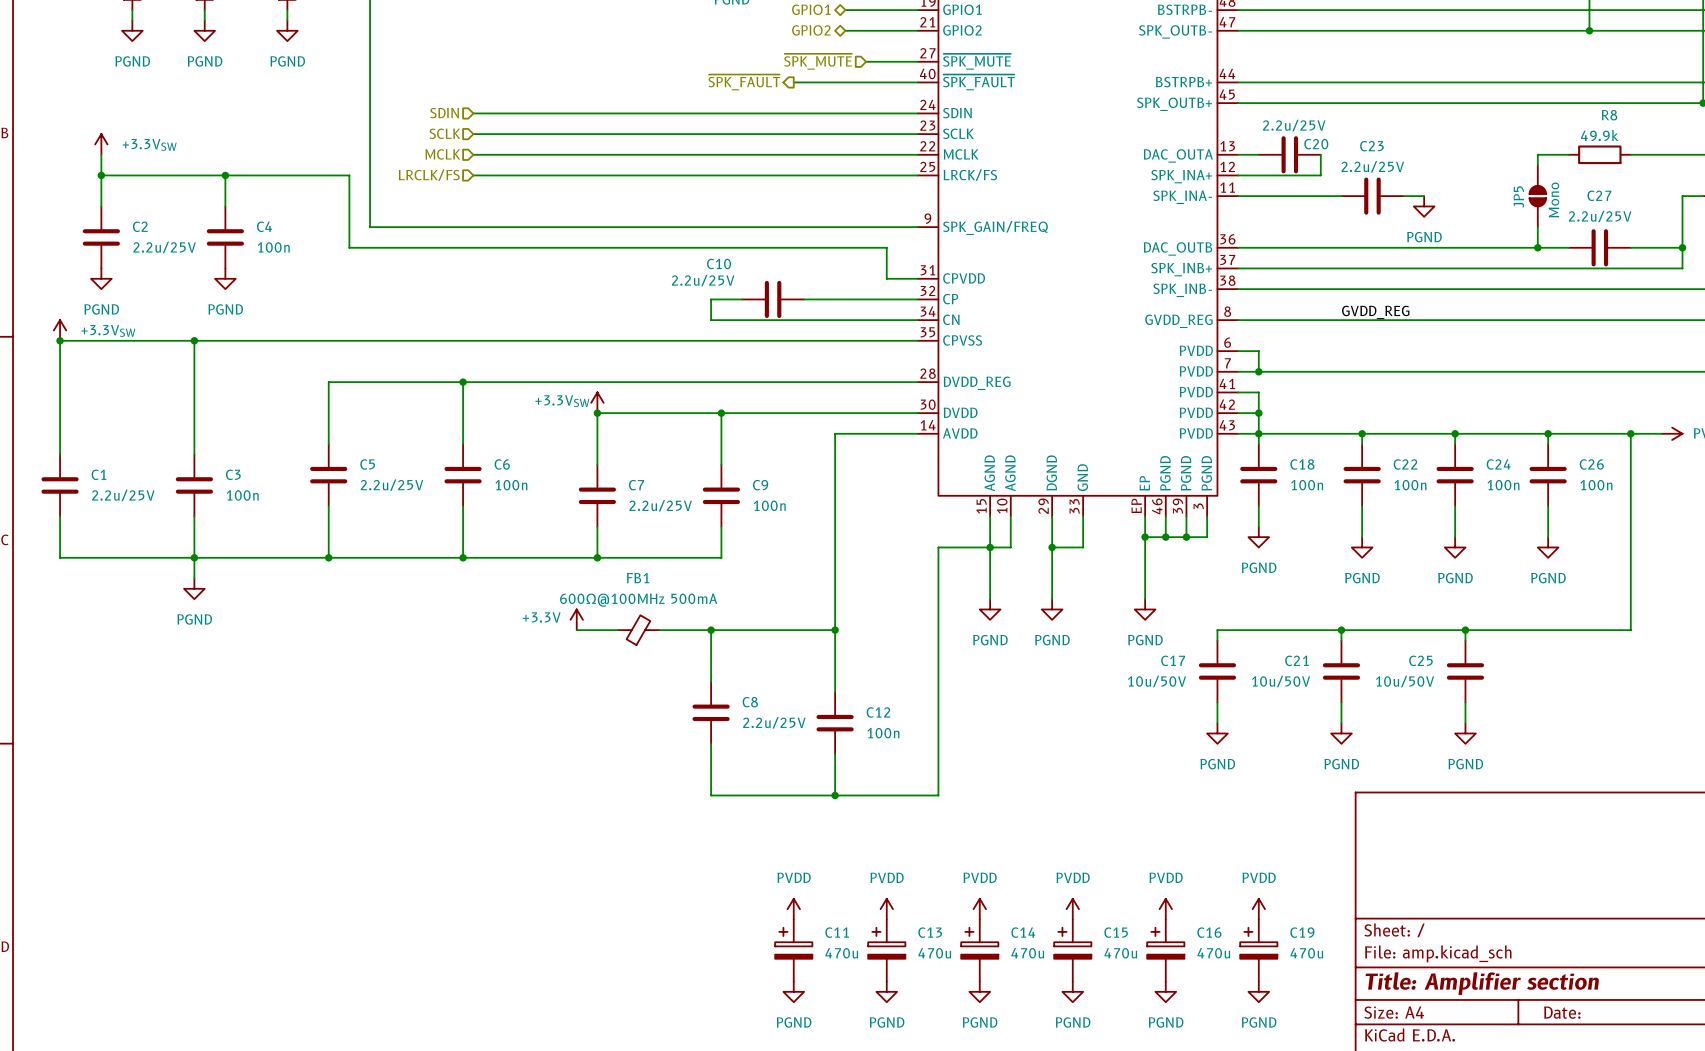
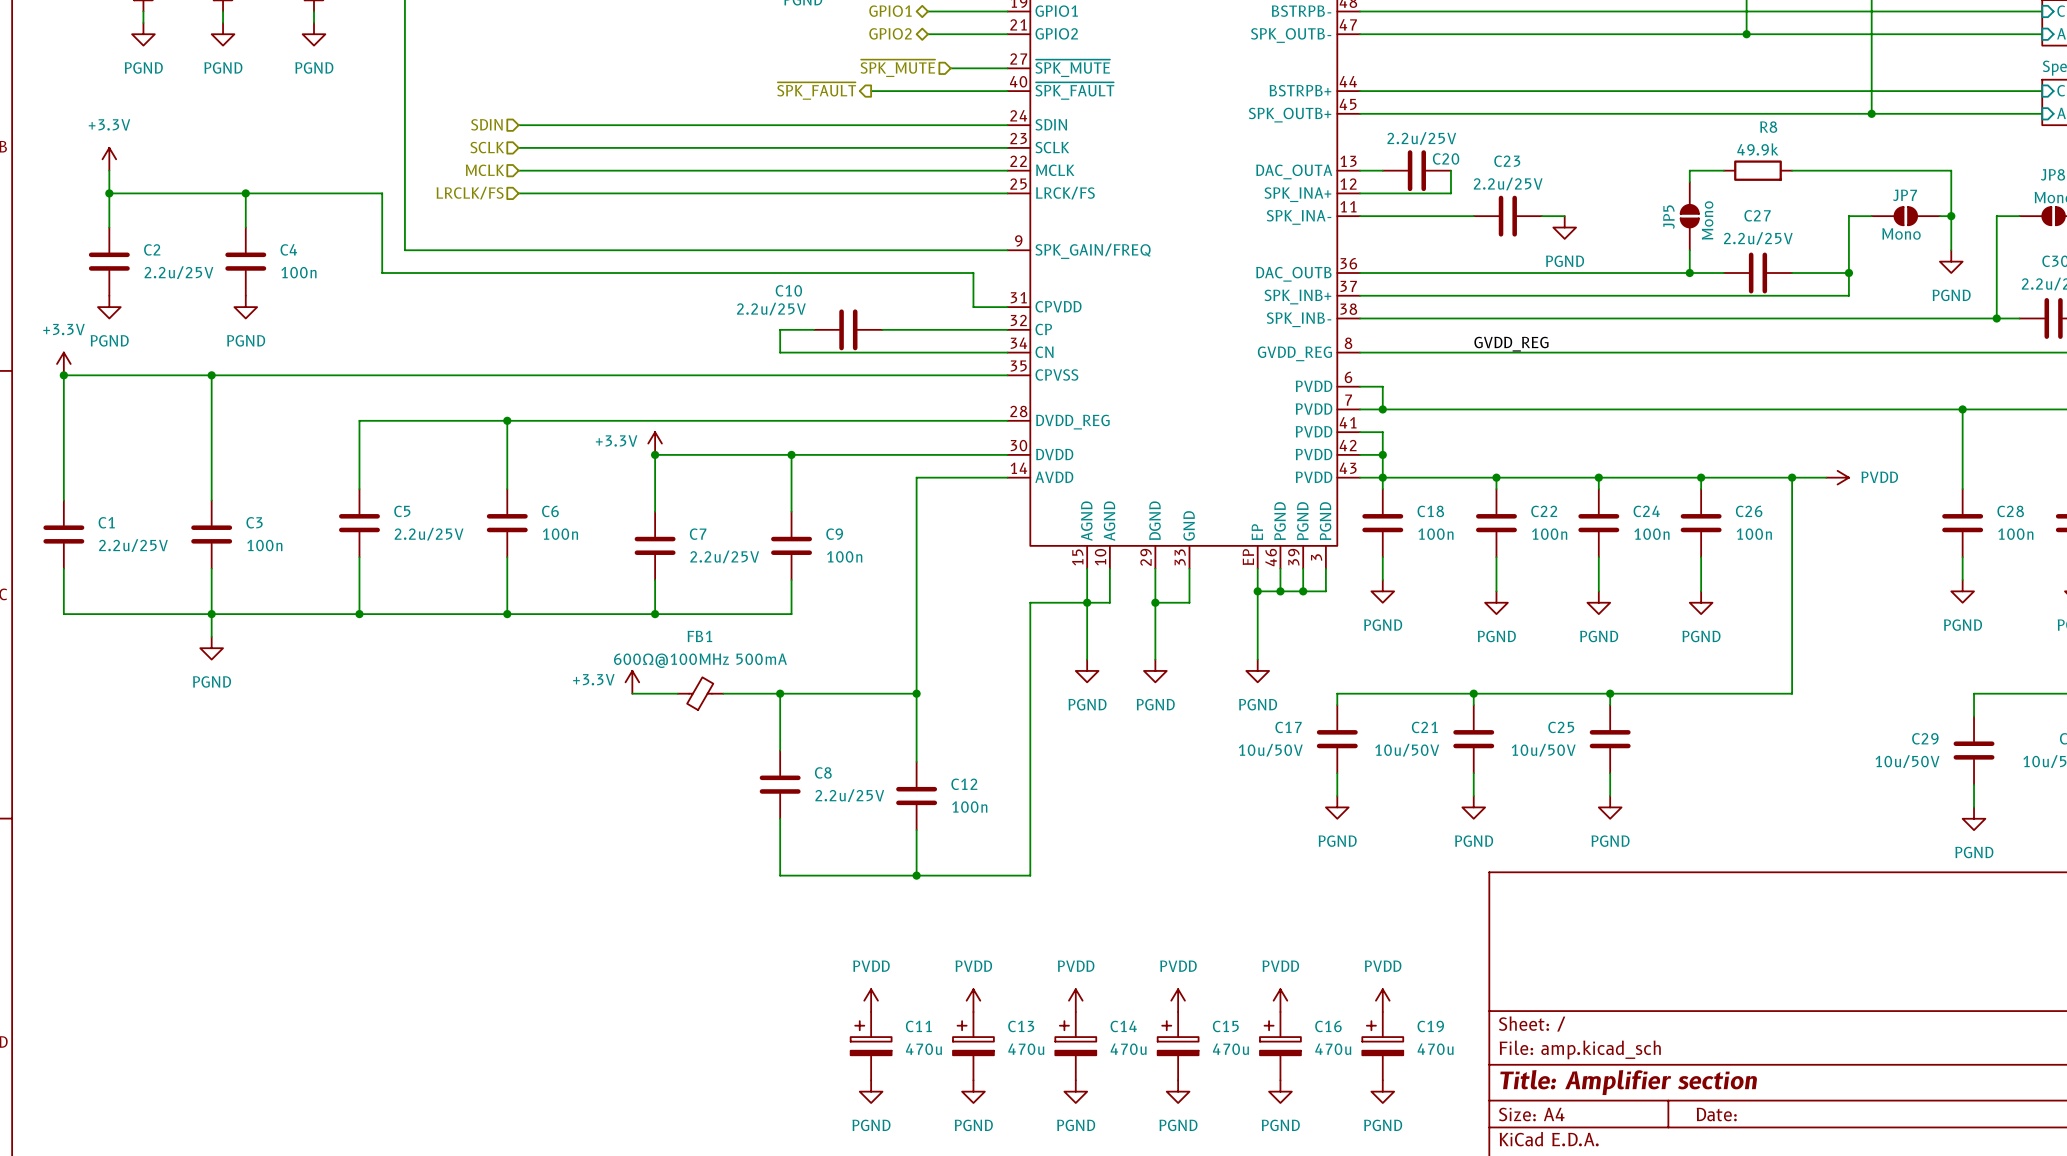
power symbol: +3.3VSW (101, 144) -> +3.3V (109, 159)
power symbol: +3.3VSW (60, 330) -> +3.3V (63, 363)
power symbol: +3.3VSW (597, 402) -> +3.3V (655, 443)

